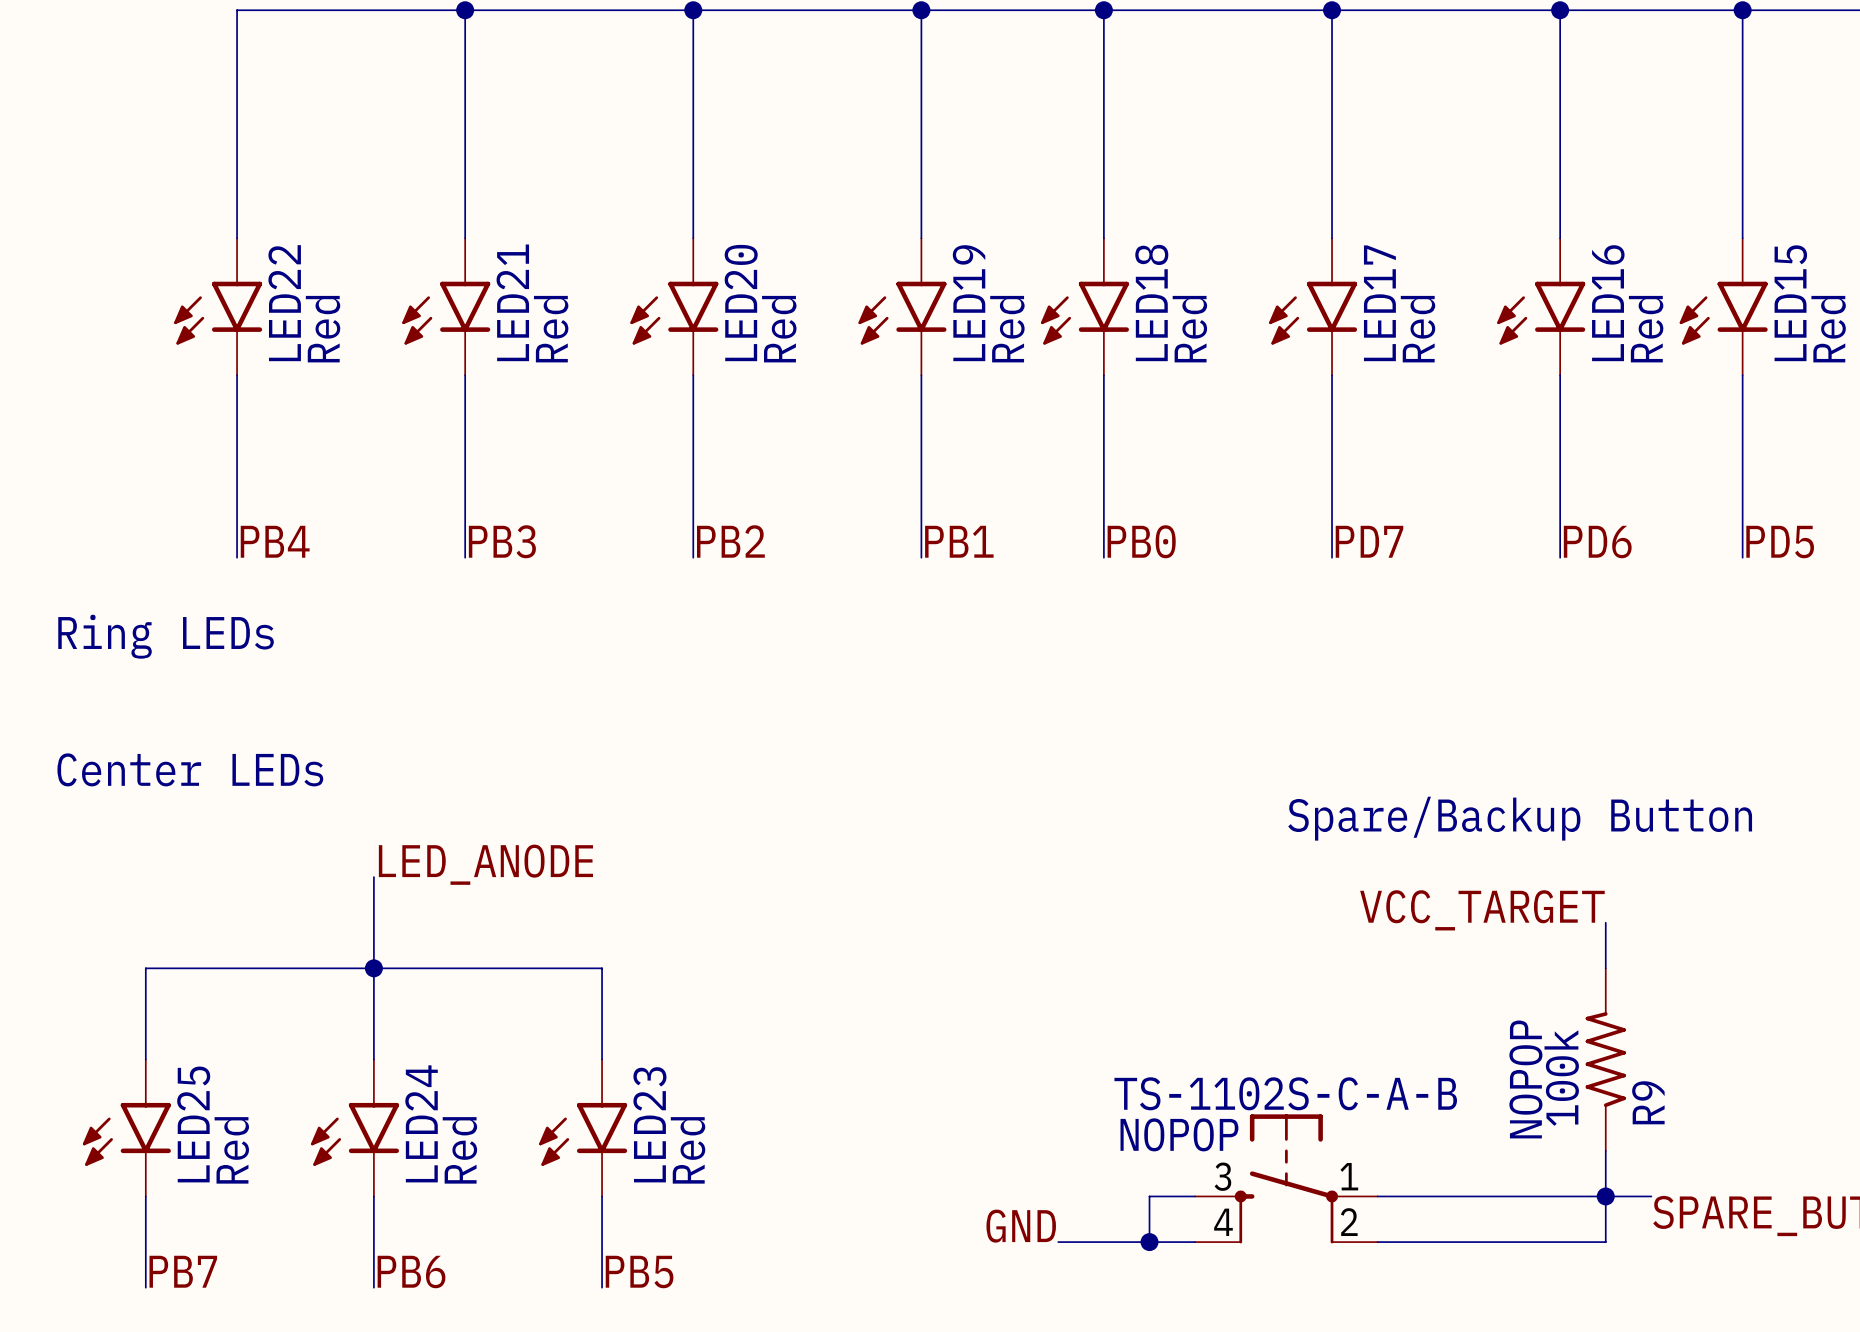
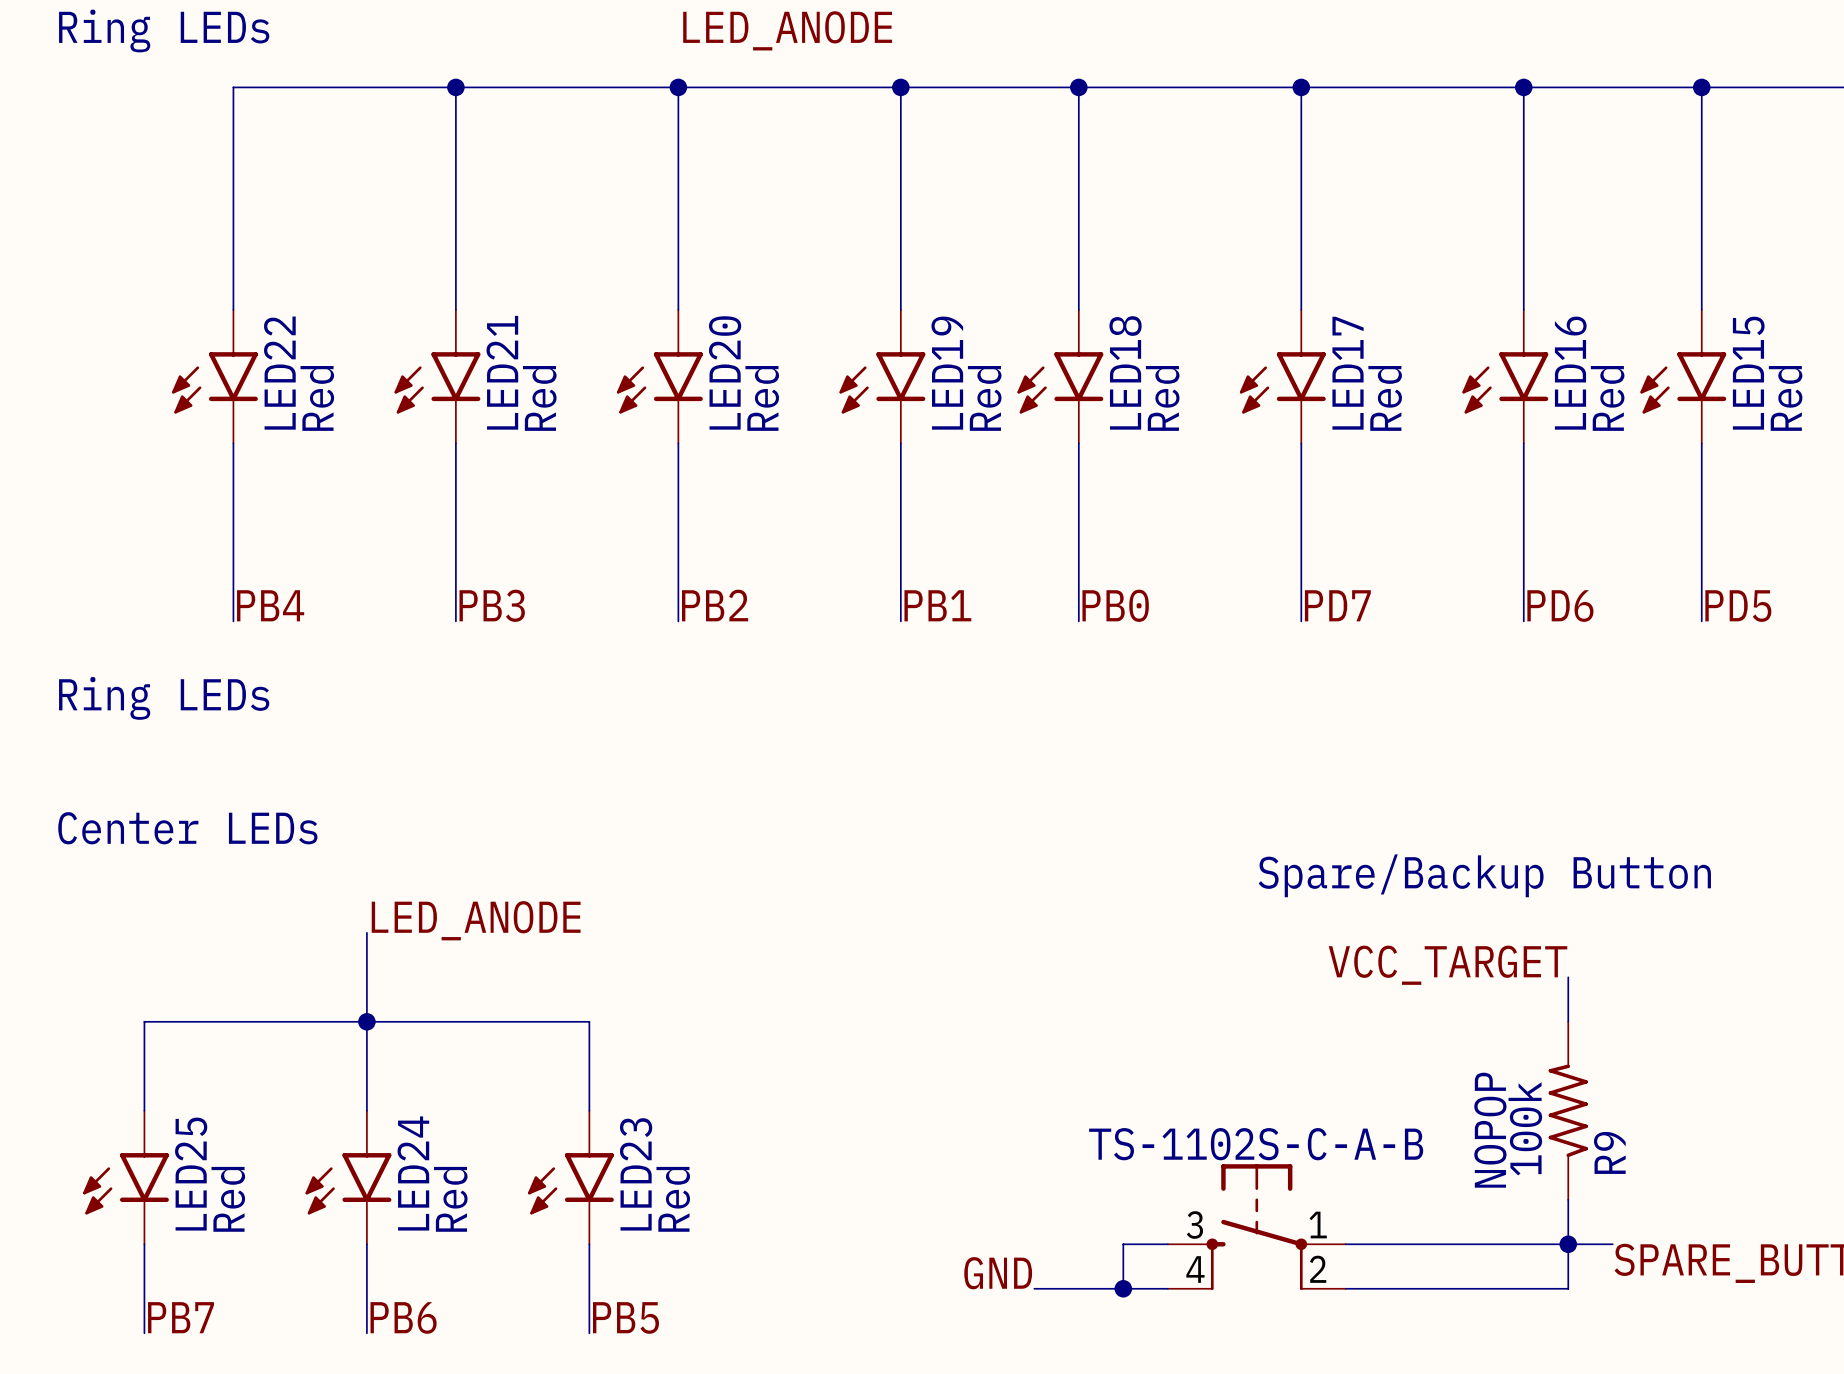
part text: NOPOP (1179, 1134) -> none

